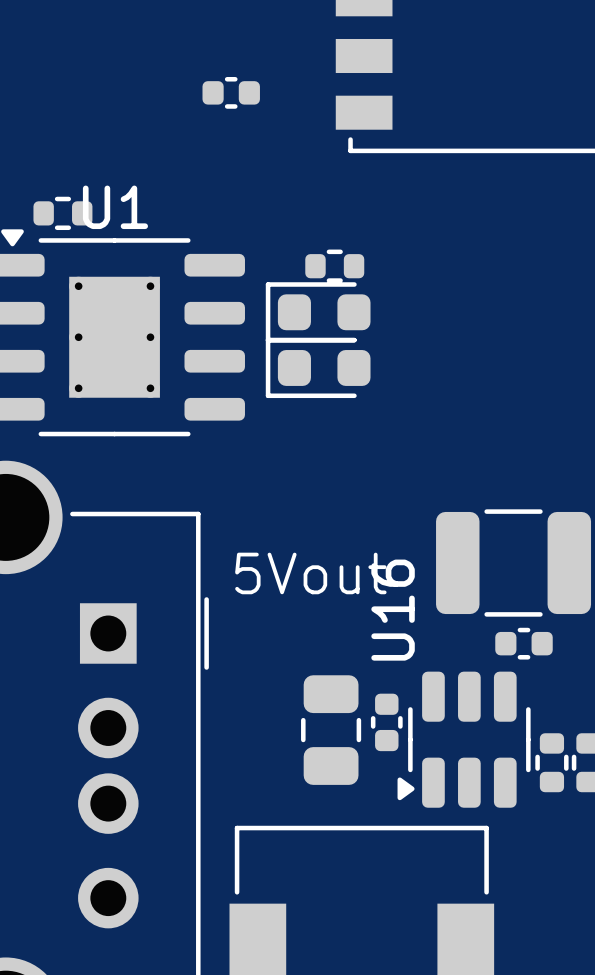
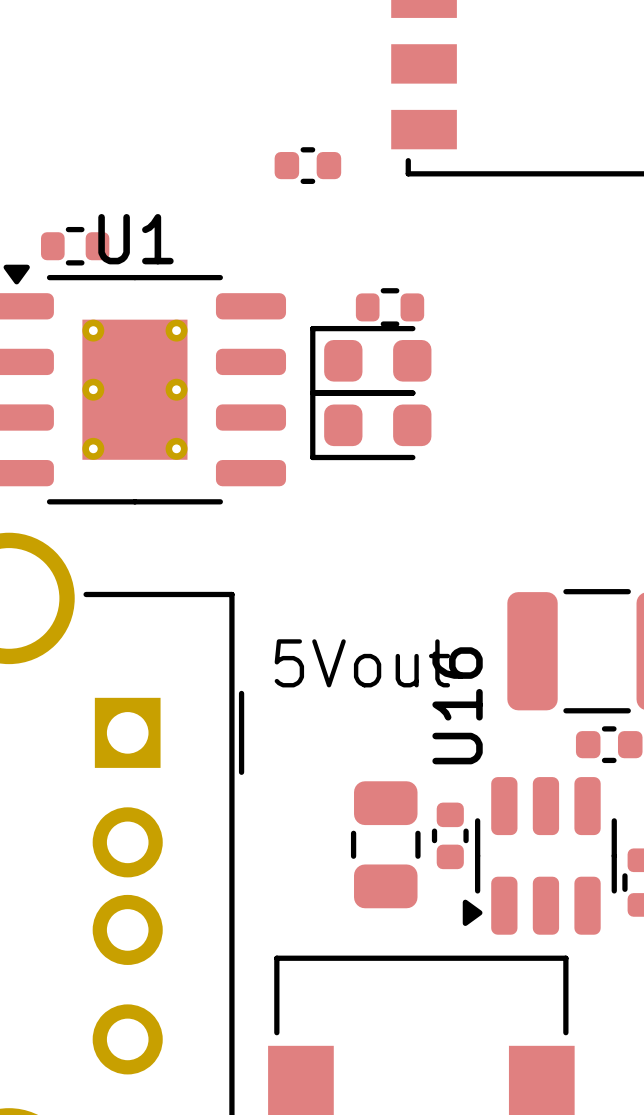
part position: (231, 92) -> (307, 165)

